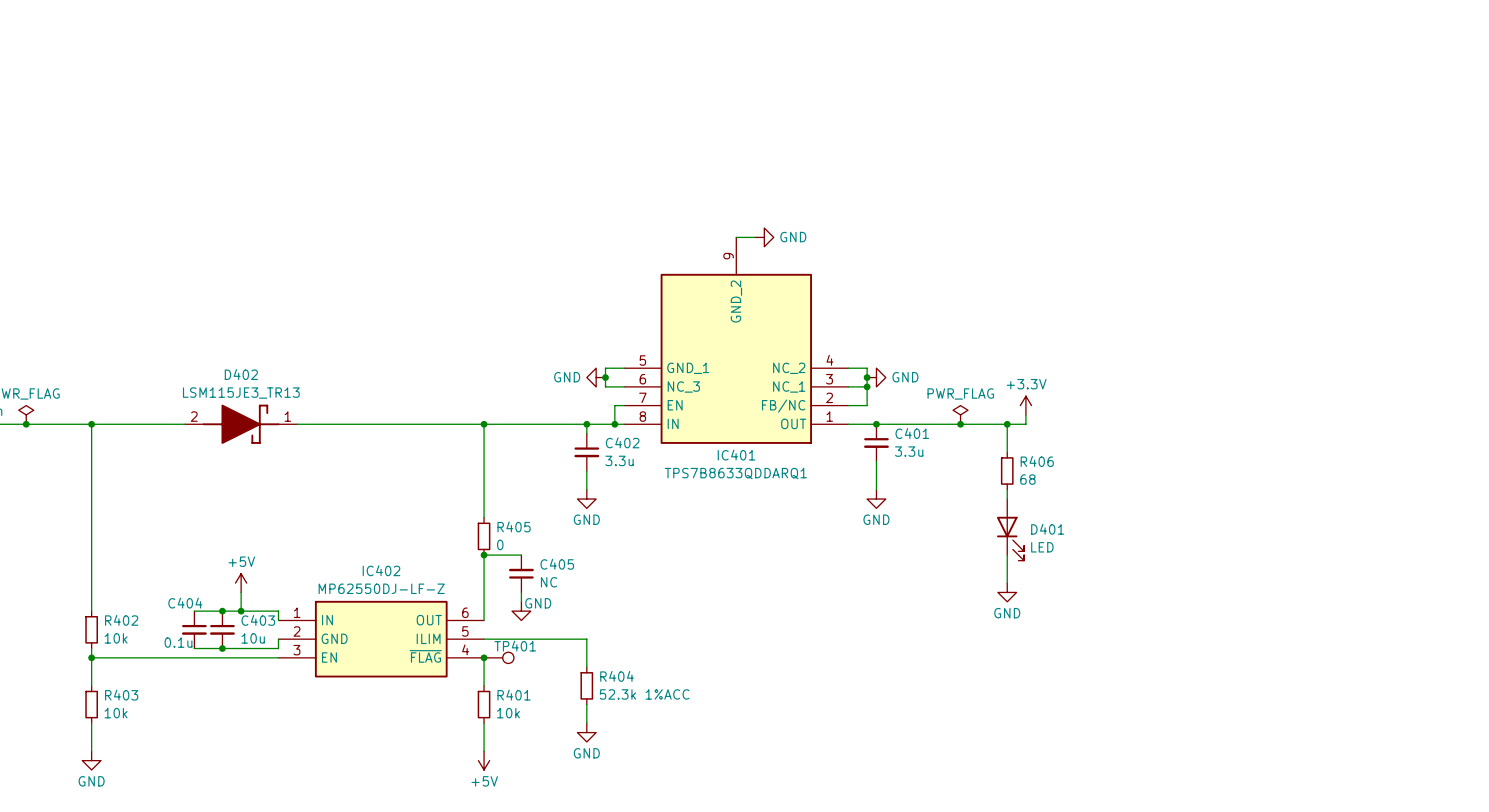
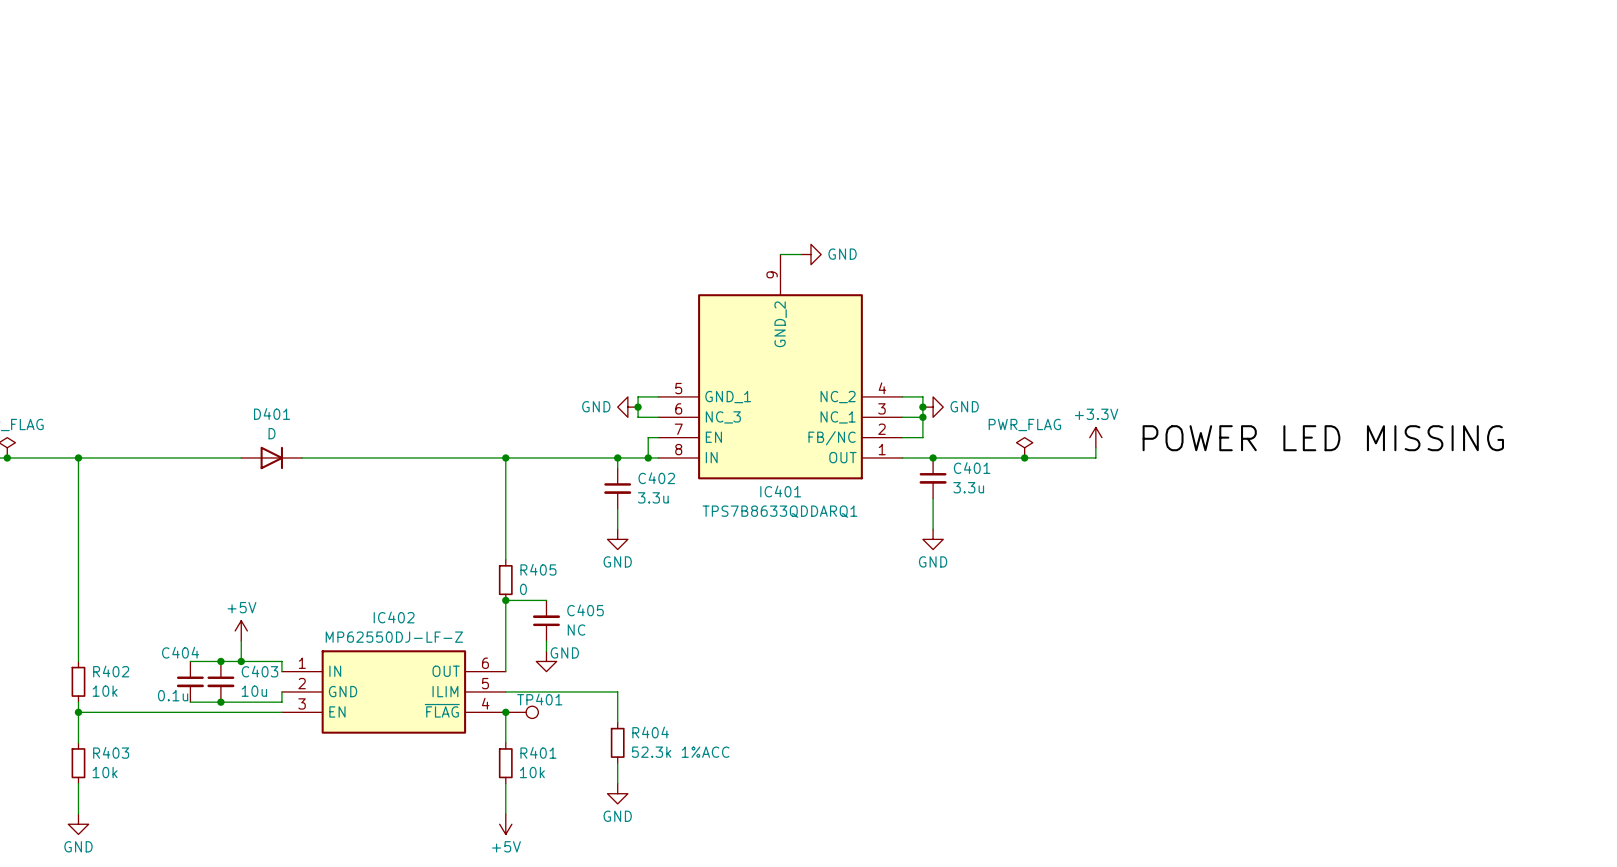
label: none -> POWER LED MISSING (1323, 438)
D402: LSM115JE3_TR13 (241, 424) -> none
wire: (1007, 424) (1007, 452) -> none
junction: (1007, 424) -> none
R406: 68 (1007, 470) -> none
wire: (1007, 489) (1007, 499) -> none
D401 symbol: [996, 499, 1025, 561] -> [241, 446, 303, 470]
D401 name position: D401 (1047, 529) -> D401 (272, 413)
D401 value: LED (1042, 547) -> D (272, 433)
wire: (1007, 555) (1007, 583) -> none
power symbol: GND (1007, 592) -> none

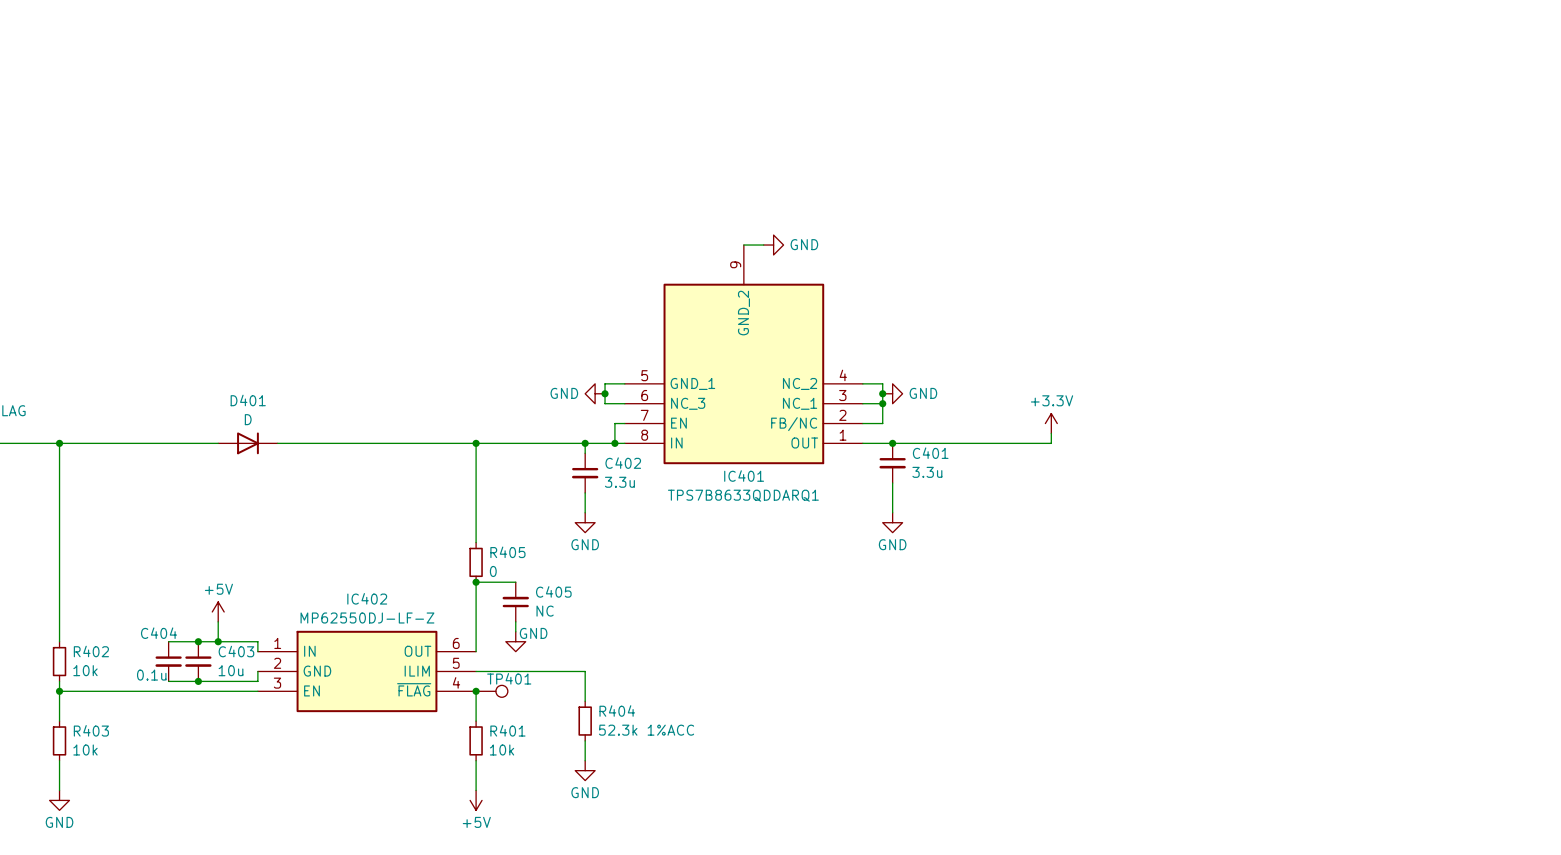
label: POWER LED MISSING (1323, 438) -> none
power symbol: PWR_FLAG (1024, 447) -> none
junction: (1024, 457) -> none

